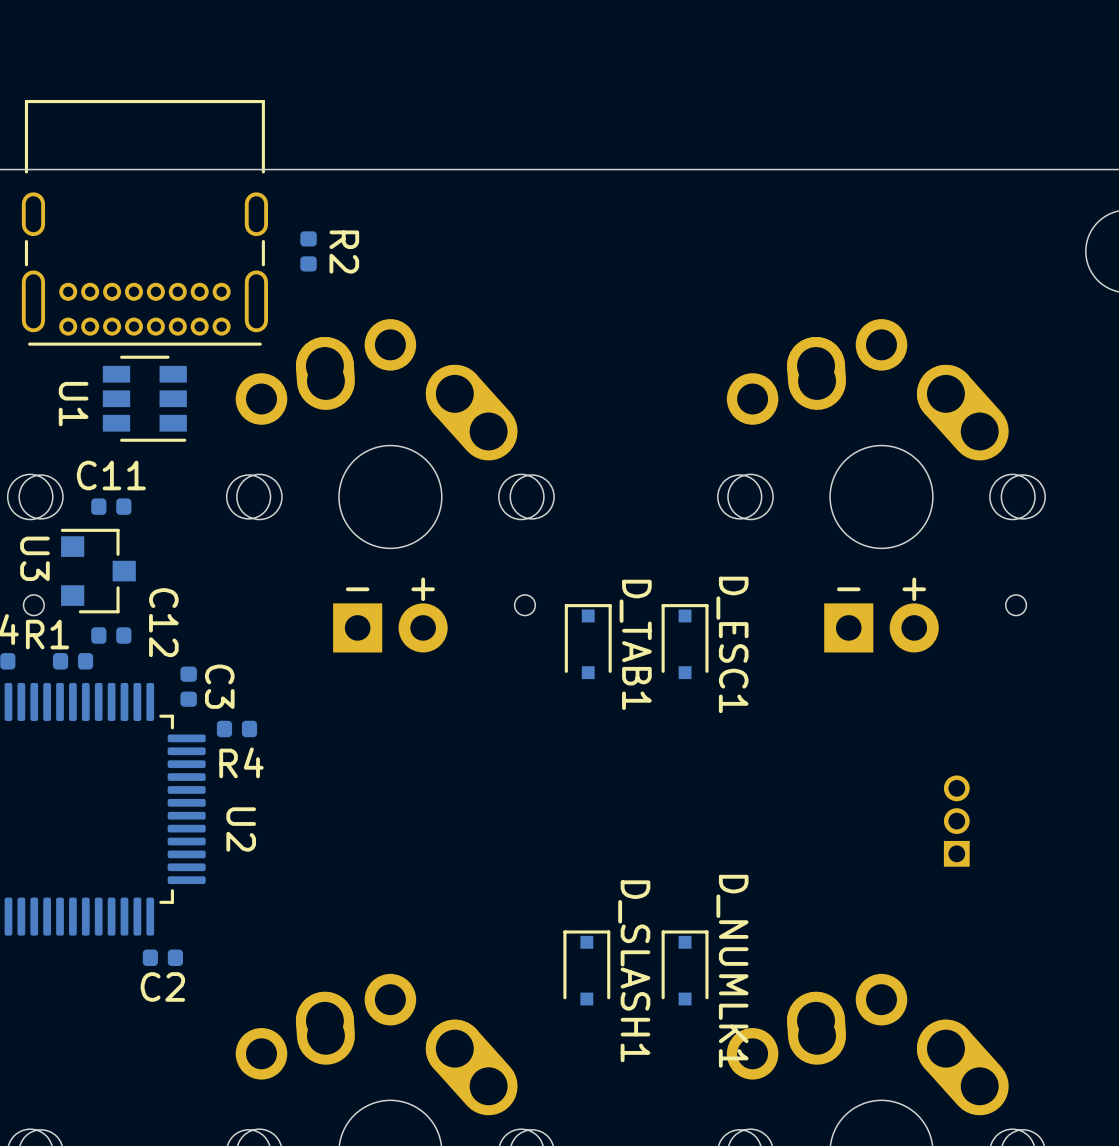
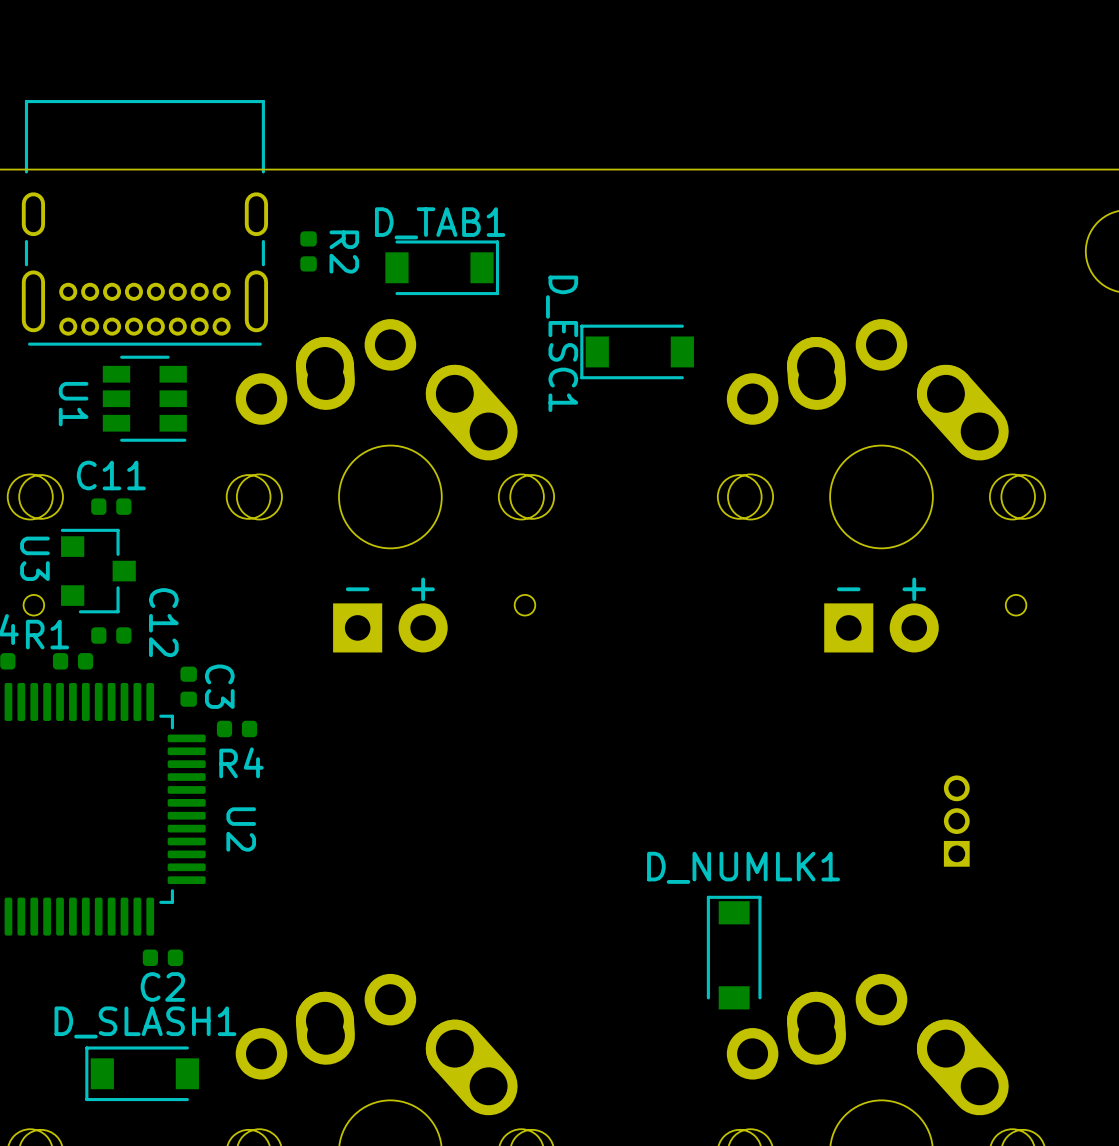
D_TAB1 footprint: [564, 604, 612, 680] -> [385, 240, 500, 296]
D_ESC1 footprint: [661, 604, 709, 680] -> [580, 324, 694, 380]
D_TAB1 name position: D_TAB1 (635, 644) -> D_TAB1 (440, 223)
D_ESC1 name position: D_ESC1 (732, 644) -> D_ESC1 (562, 343)
D_SLASH1 footprint: [563, 930, 611, 1006] -> [85, 1046, 199, 1102]
D_NUMLK1 footprint: [661, 930, 709, 1006] -> [706, 895, 762, 1010]
D_SLASH1 name position: D_SLASH1 (634, 971) -> D_SLASH1 (145, 1022)
D_NUMLK1 name position: D_NUMLK1 (732, 971) -> D_NUMLK1 (743, 867)

